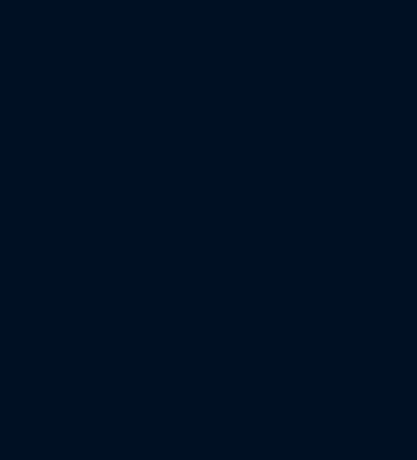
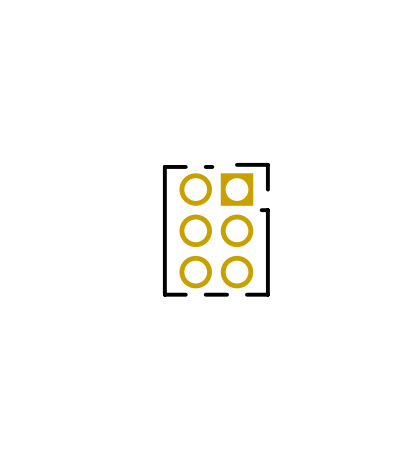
part: none -> (216, 229)

